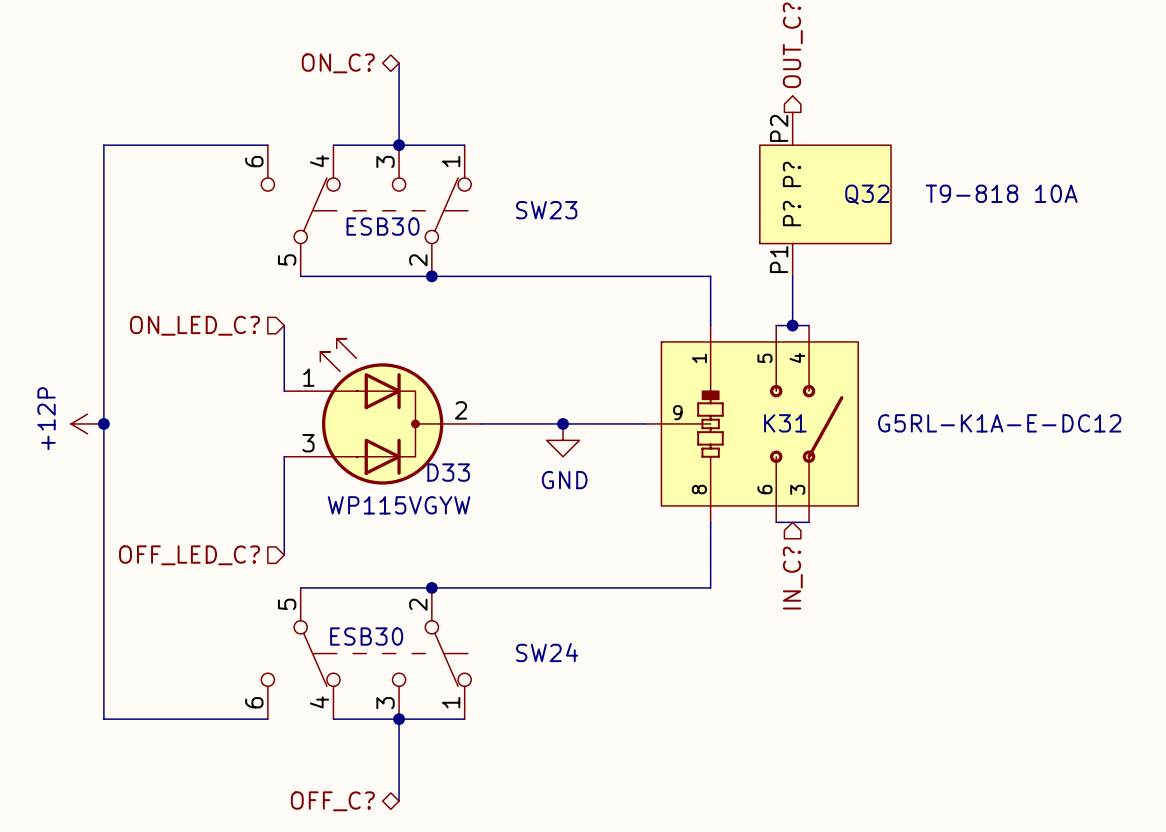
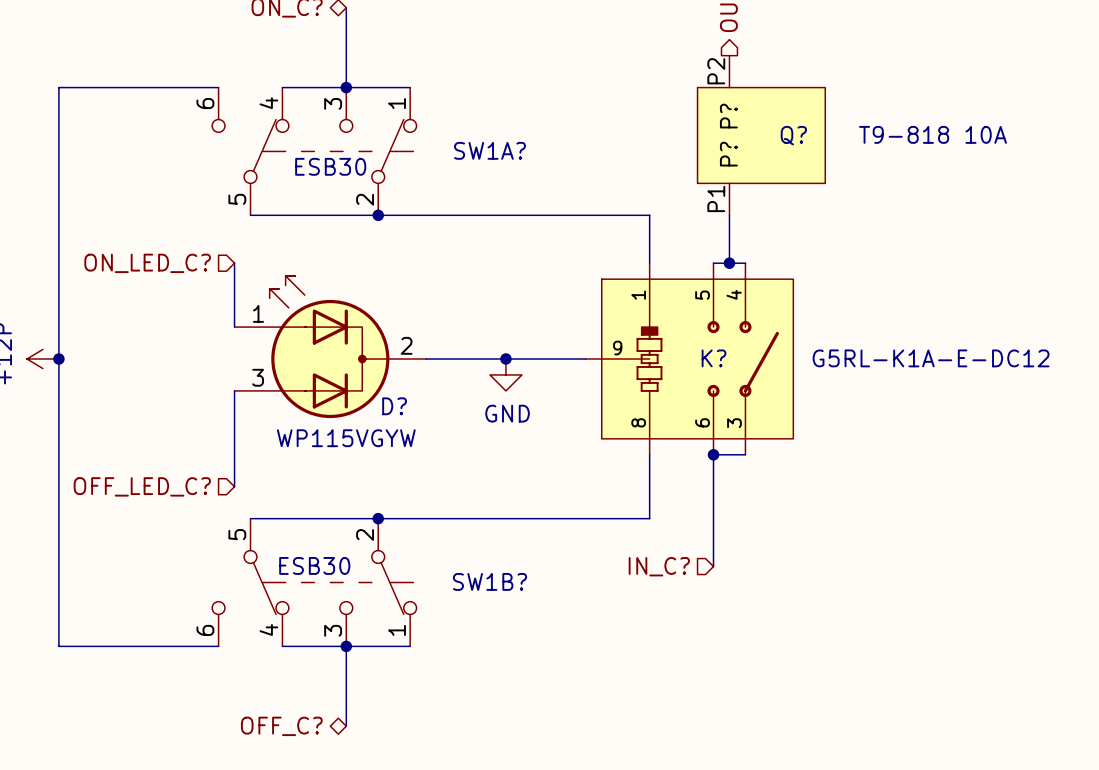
Q32 name: Q32 (867, 194) -> Q? (793, 135)
SW23 name: SW23 (546, 210) -> SW1A? (489, 150)
K31 name: K31 (785, 423) -> K? (714, 358)
D33 name: D33 (448, 472) -> D? (394, 406)
wire: none -> (713, 454) (713, 566)
junction: none -> (713, 454)
hierarchical label rotation: 0° (792, 578) -> 90° clockwise (659, 566)
hierarchical label position: IN_C? (792, 578) -> IN_C? (659, 566)
SW24 name: SW24 (547, 652) -> SW1B? (489, 581)

